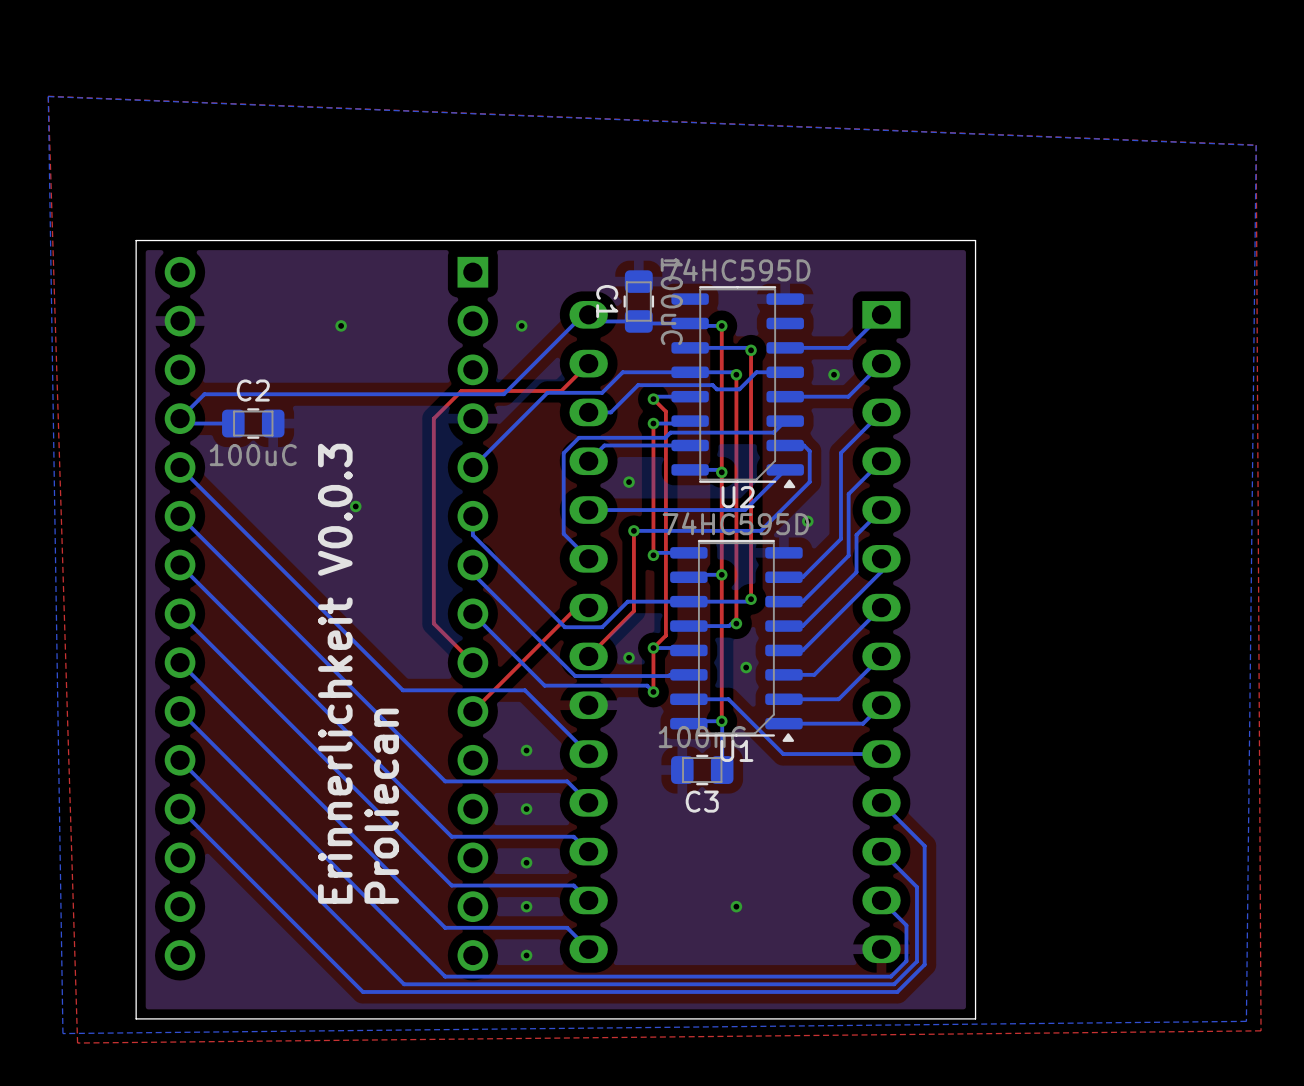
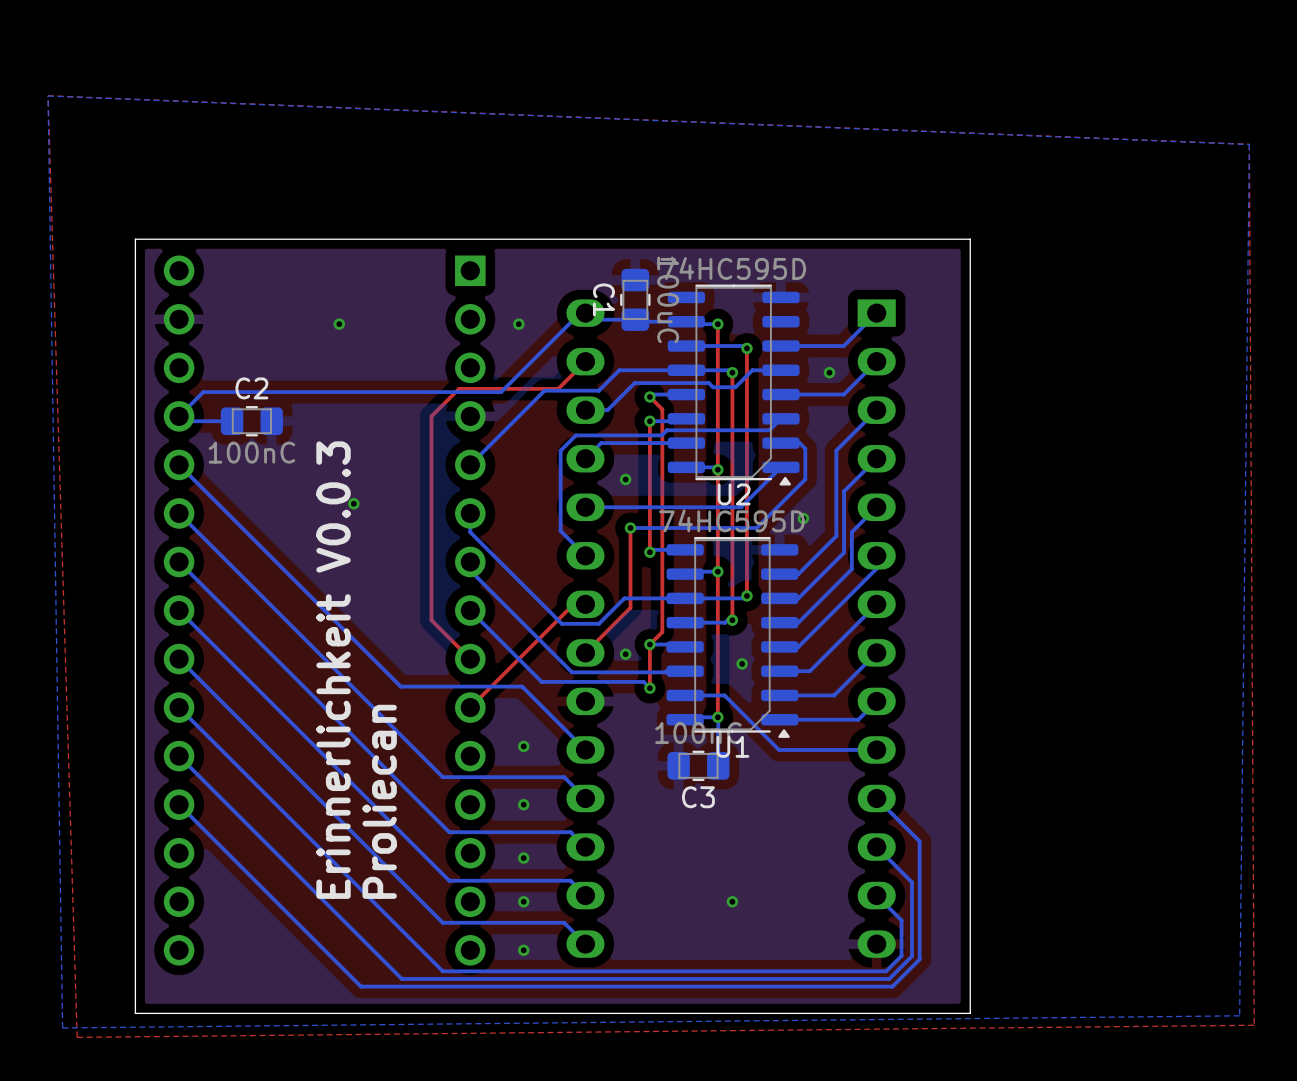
C2 value: 100uC (253, 455) -> 100nC (251, 452)

